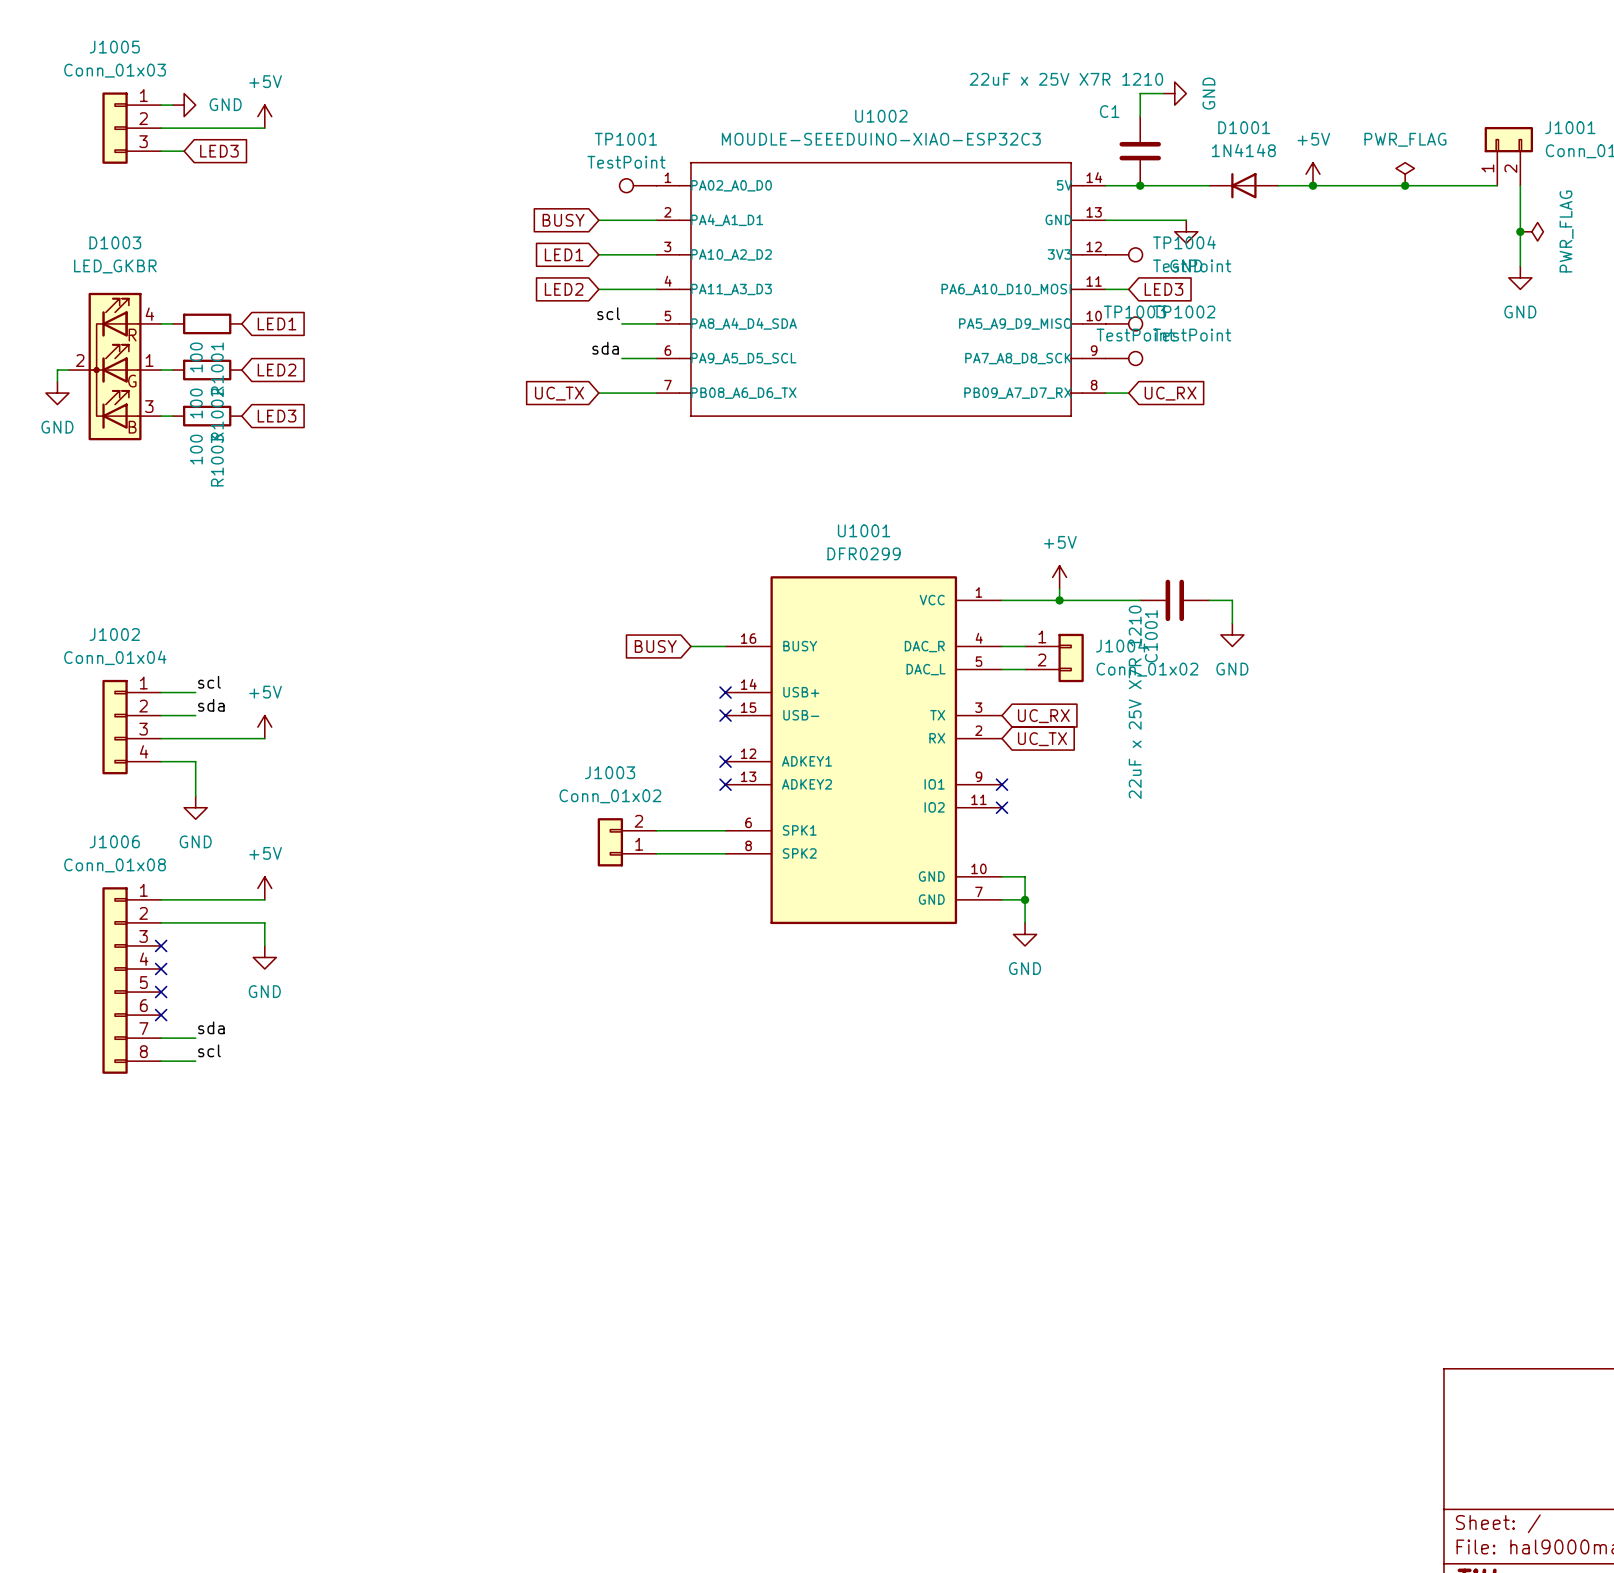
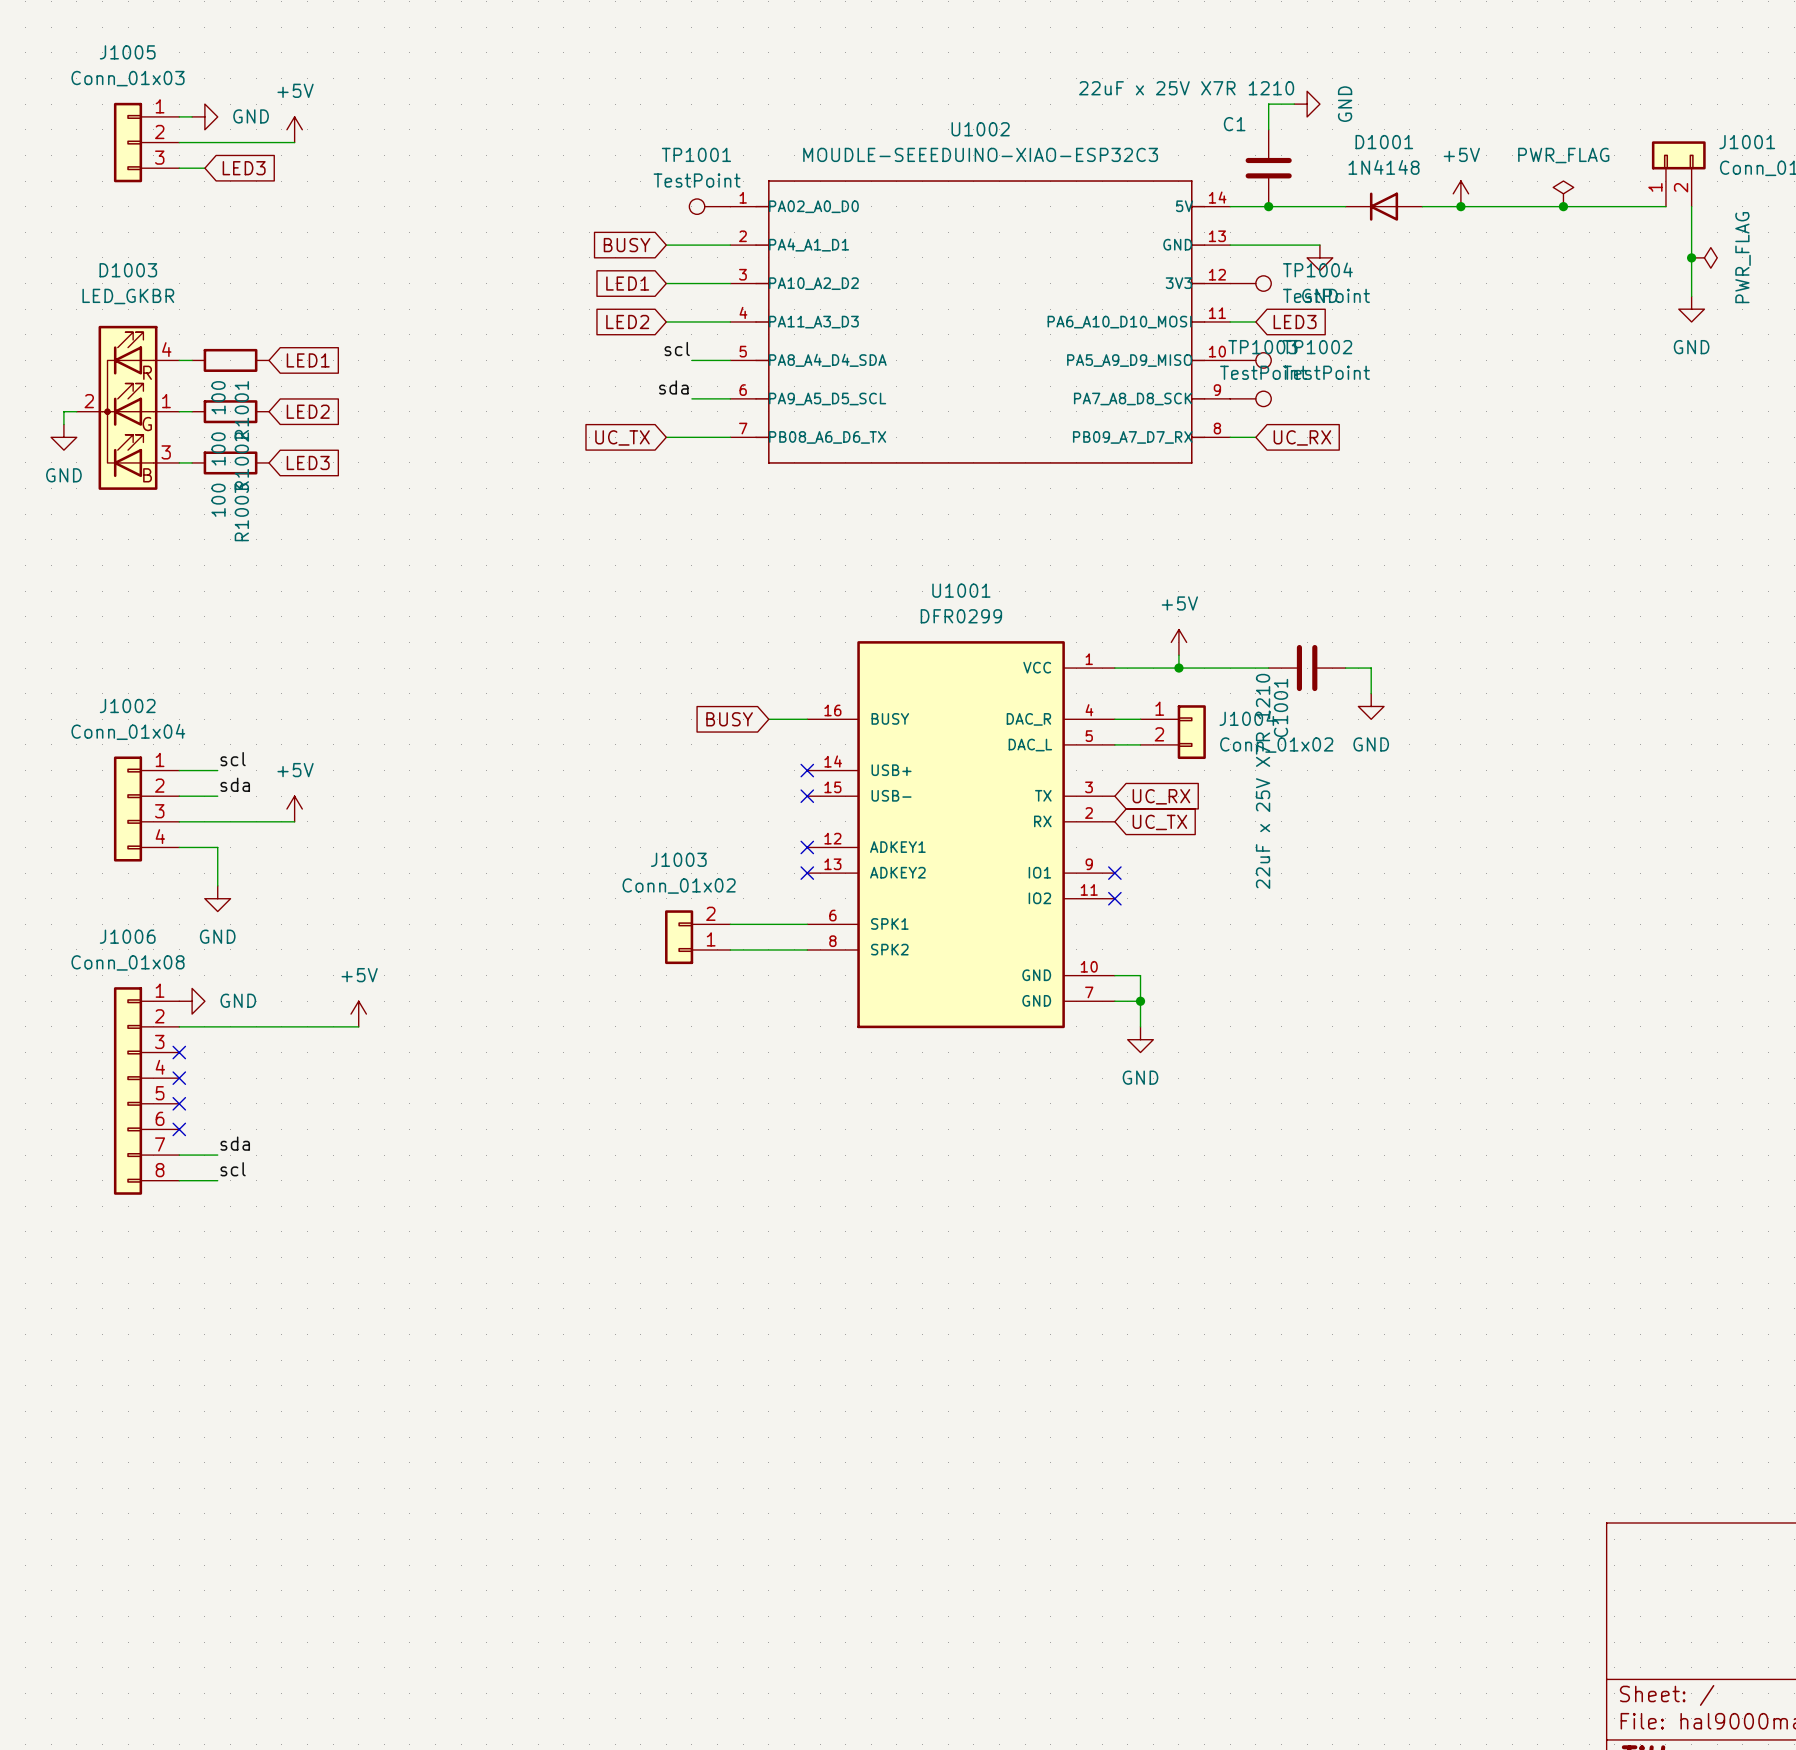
power symbol position: +5V (264, 888) -> +5V (358, 1014)
wire: (161, 899) (264, 899) -> none
wire: (264, 922) (264, 945) -> (294, 1026) (358, 1026)
power symbol rotation: 0° (264, 957) -> 90° counterclockwise (192, 1001)
power symbol position: GND (264, 957) -> GND (192, 1001)

